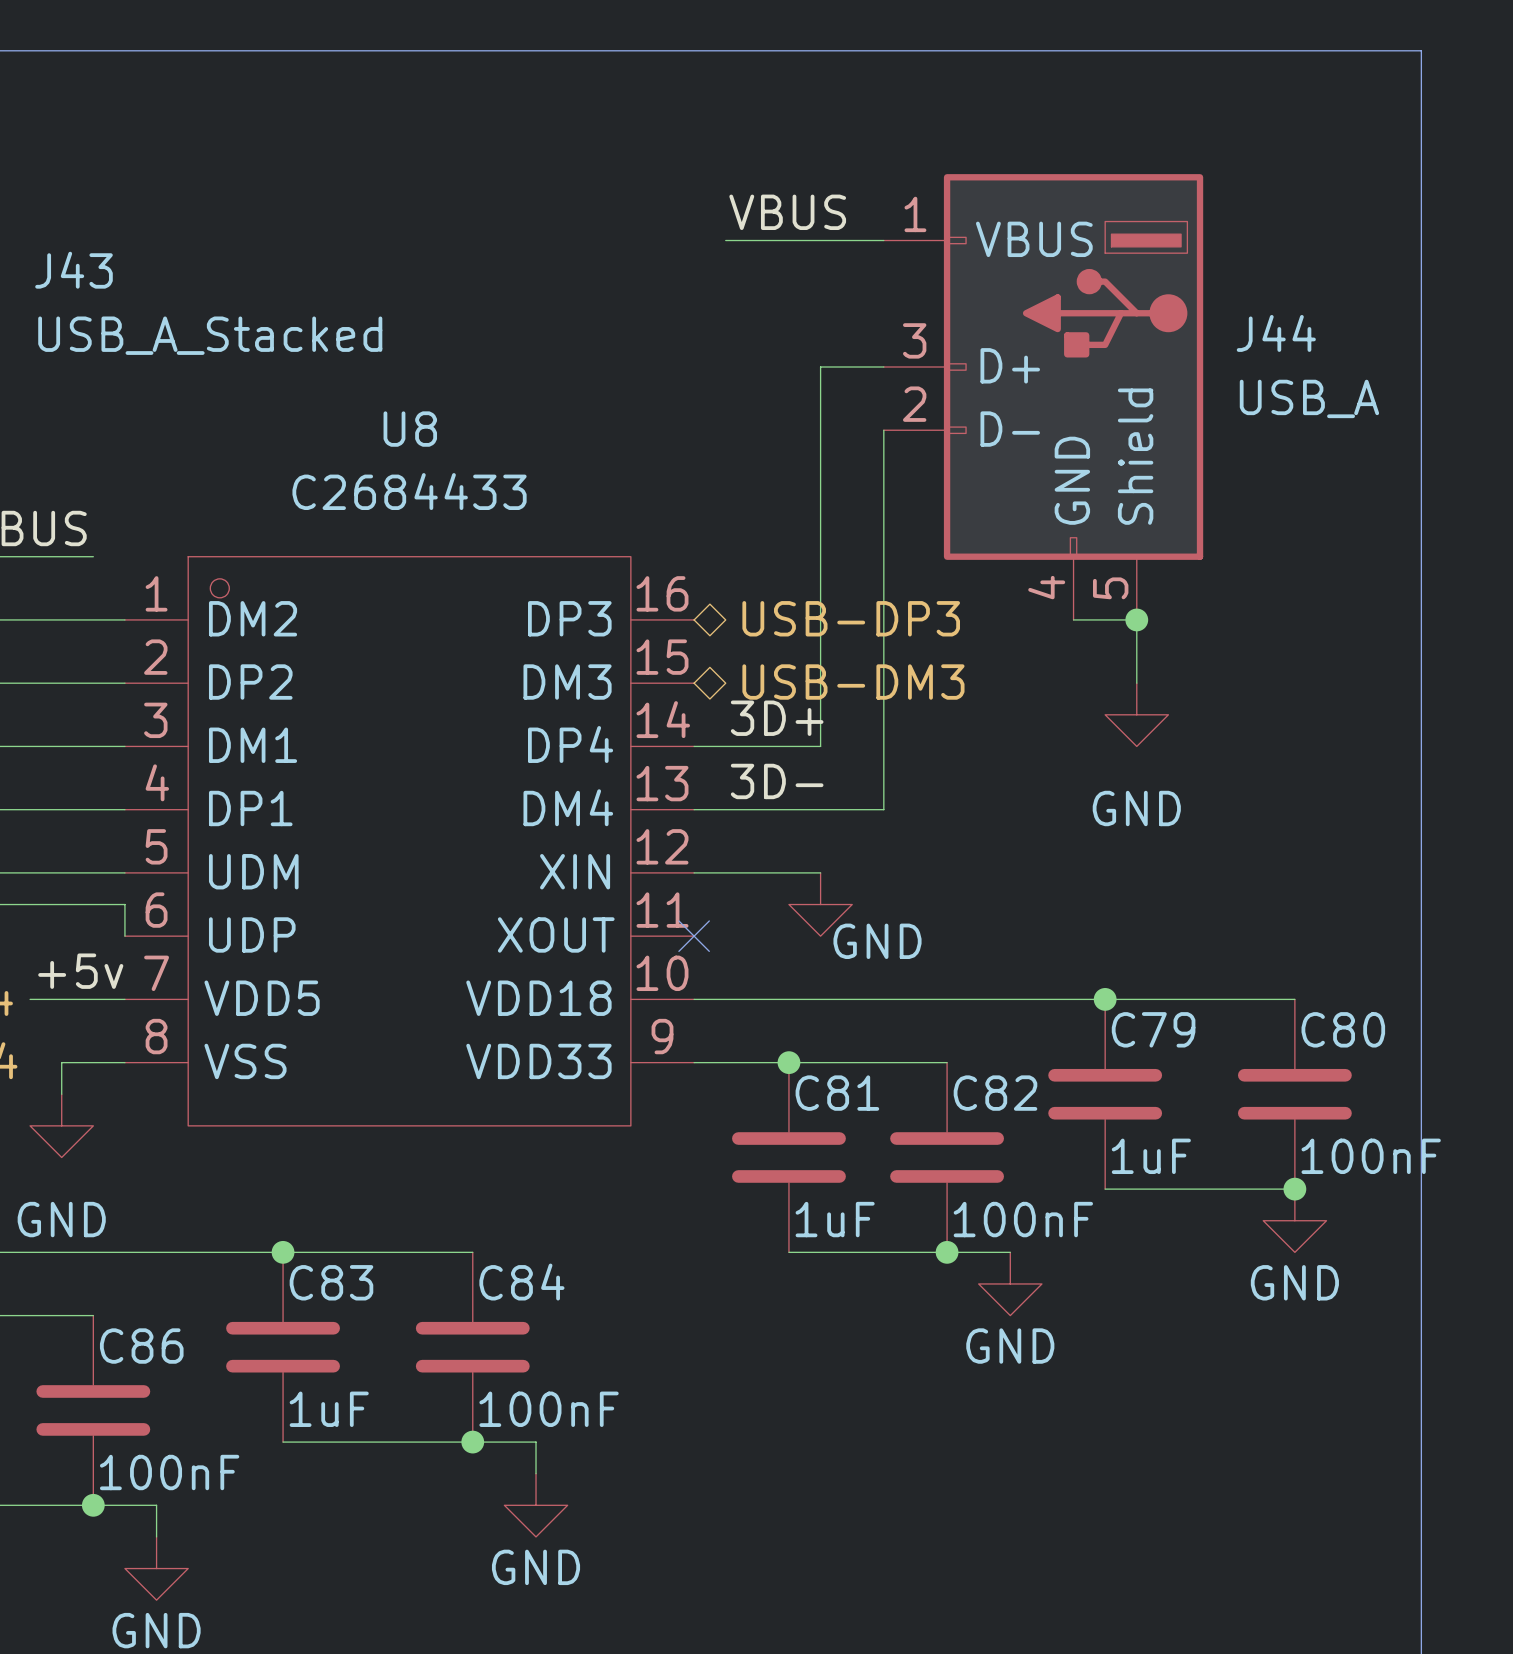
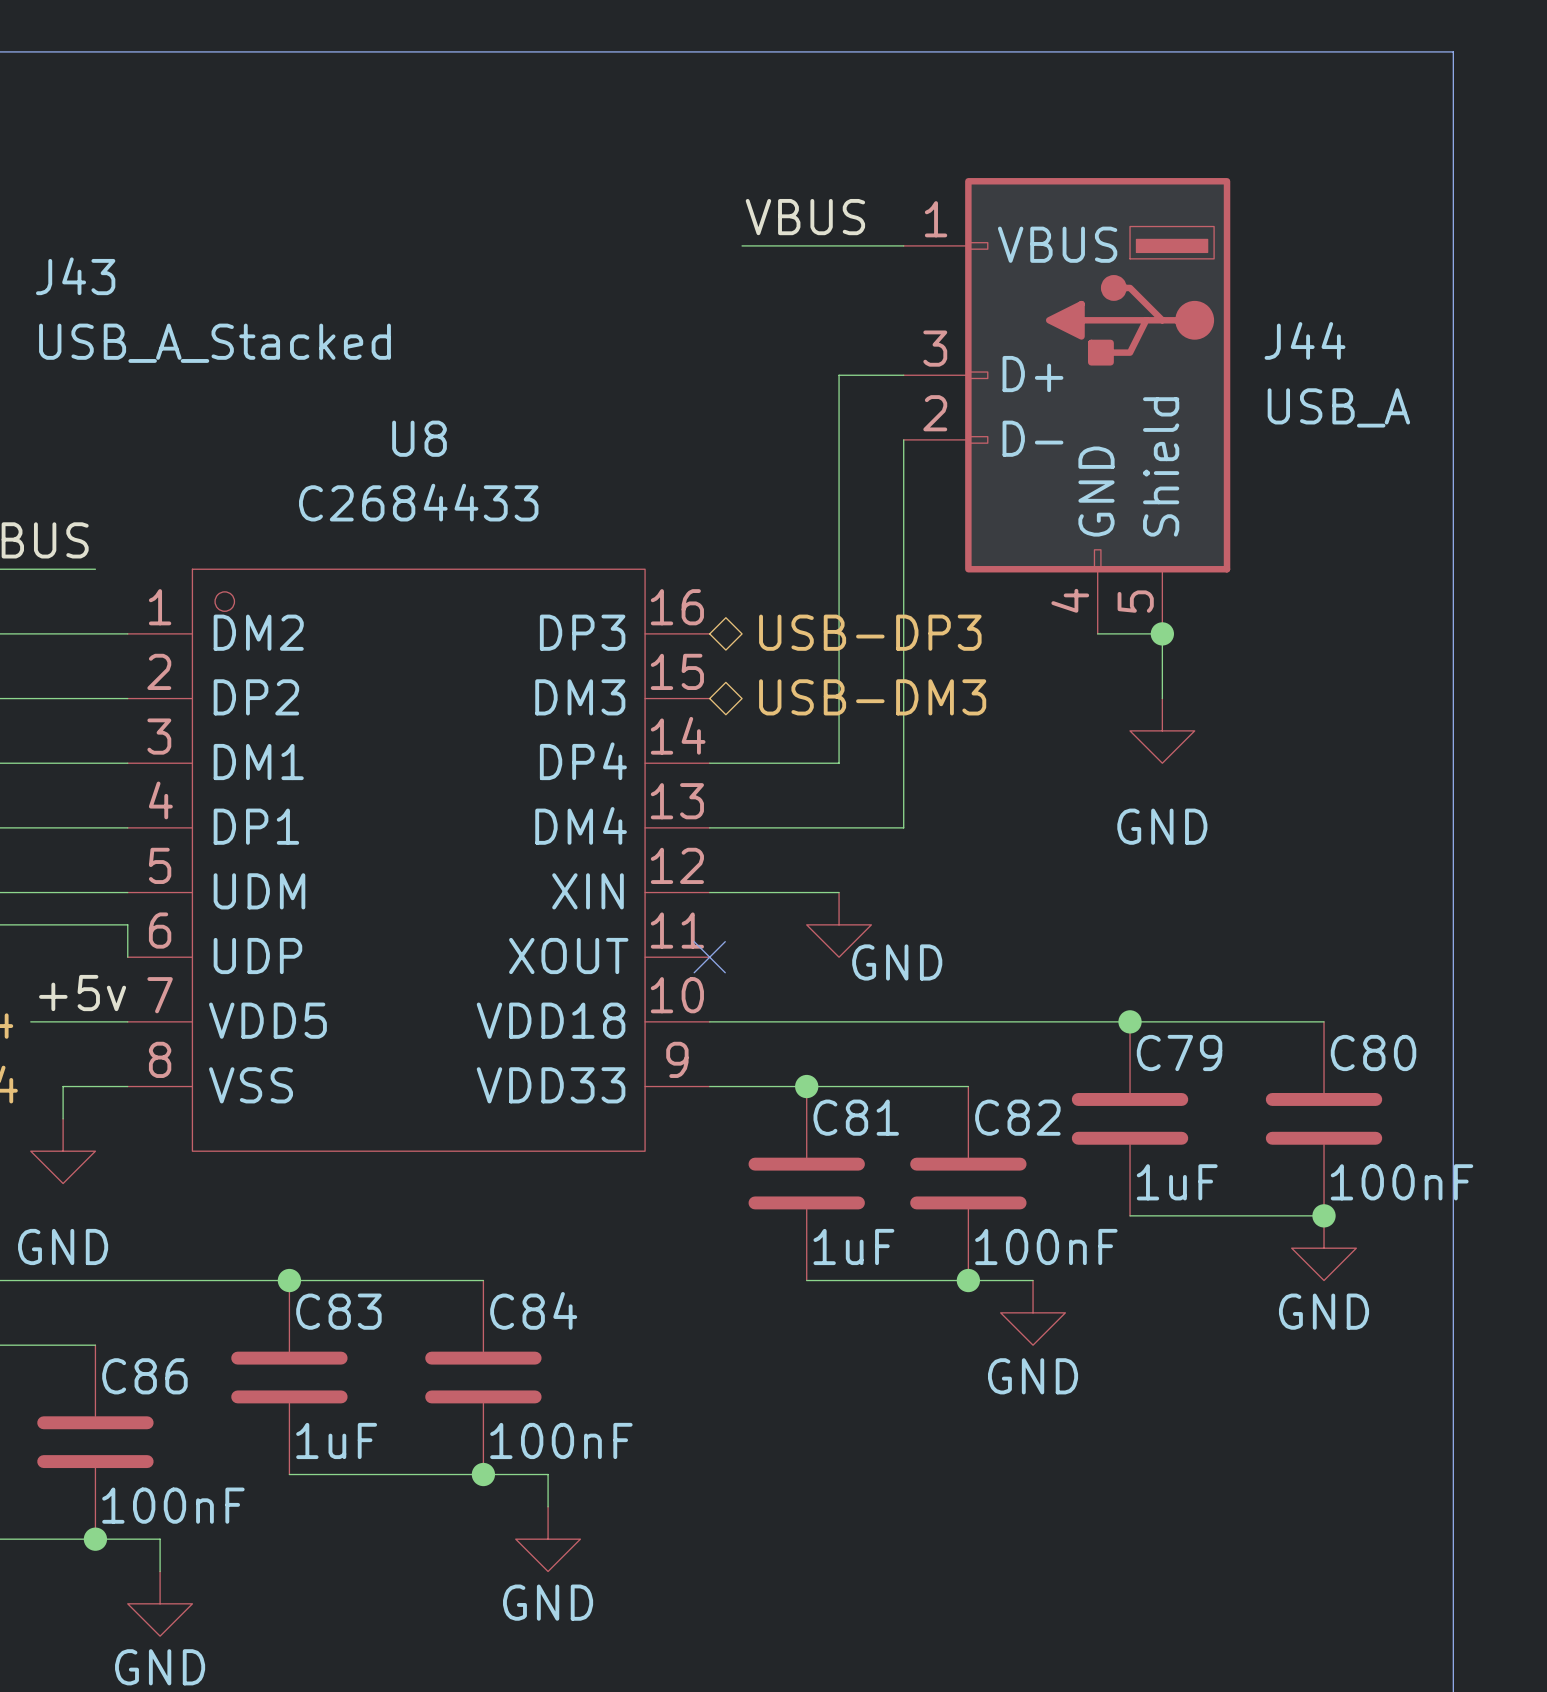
label: 3D+ (777, 718) -> none
label: 3D- (777, 781) -> none

